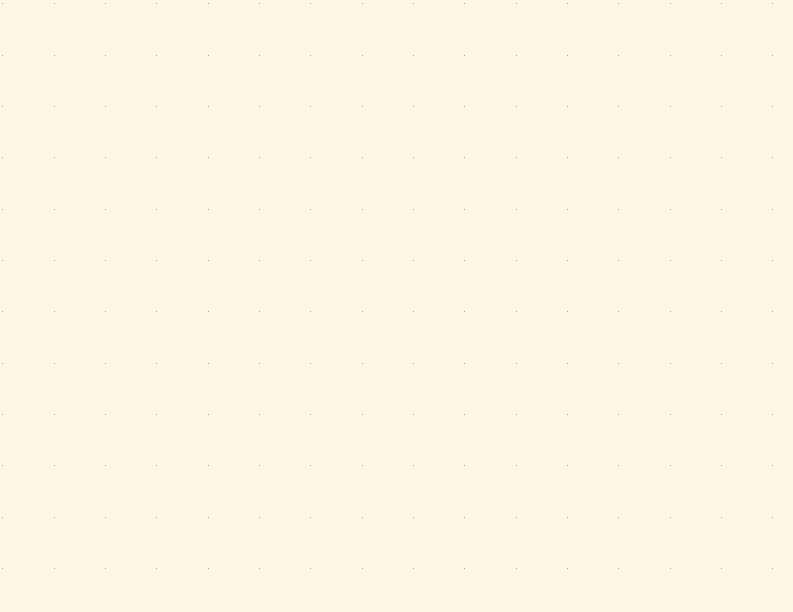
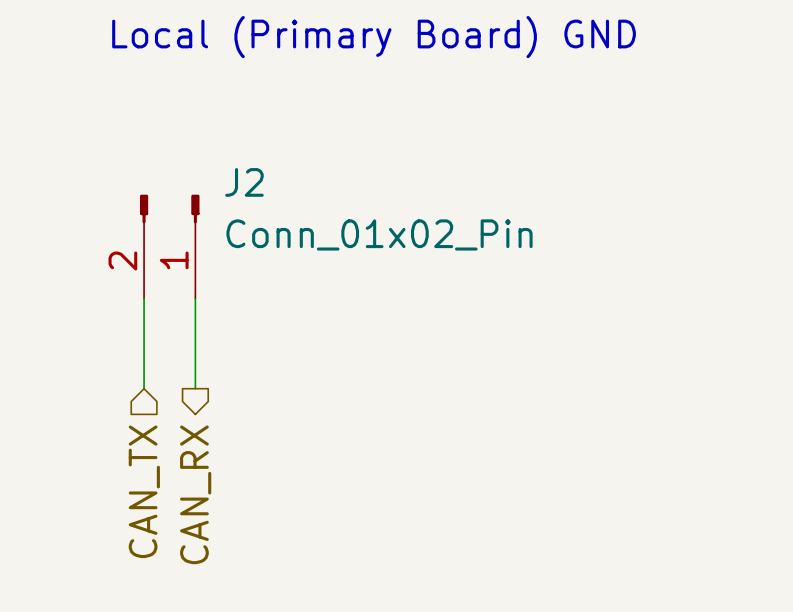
text: none -> Local (Primary Board) GND (374, 37)
J2: none -> Conn_01x02_Pin (169, 246)
wire: none -> (144, 298) (144, 388)
wire: none -> (195, 298) (195, 388)
hierarchical label: none -> CAN_TX (144, 491)
hierarchical label: none -> CAN_RX (195, 494)

